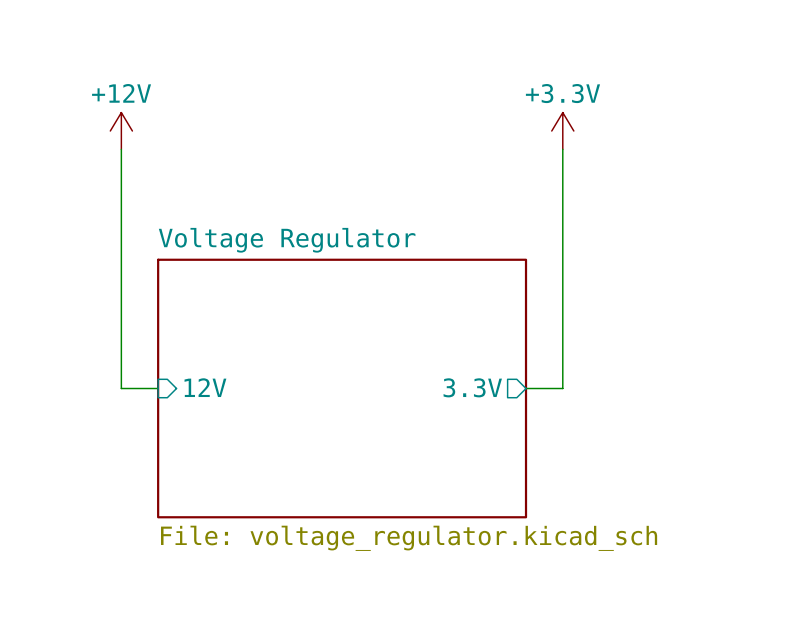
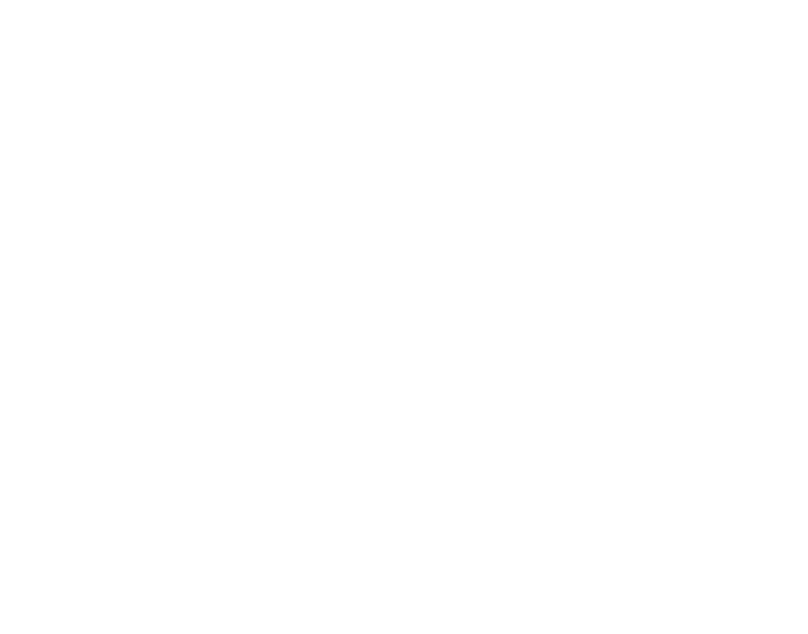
power symbol: +12V (121, 131) -> none
power symbol: +3.3V (562, 131) -> none
wire: (121, 149) (121, 388) (158, 388) -> none
wire: (562, 149) (562, 388) (526, 388) -> none
sheet pin: 12V (205, 387) -> none
sheet pin: 3.3V (472, 387) -> none
sheet Voltage Regulator: File: voltage_regulator.kicad_sch (342, 388) -> none

